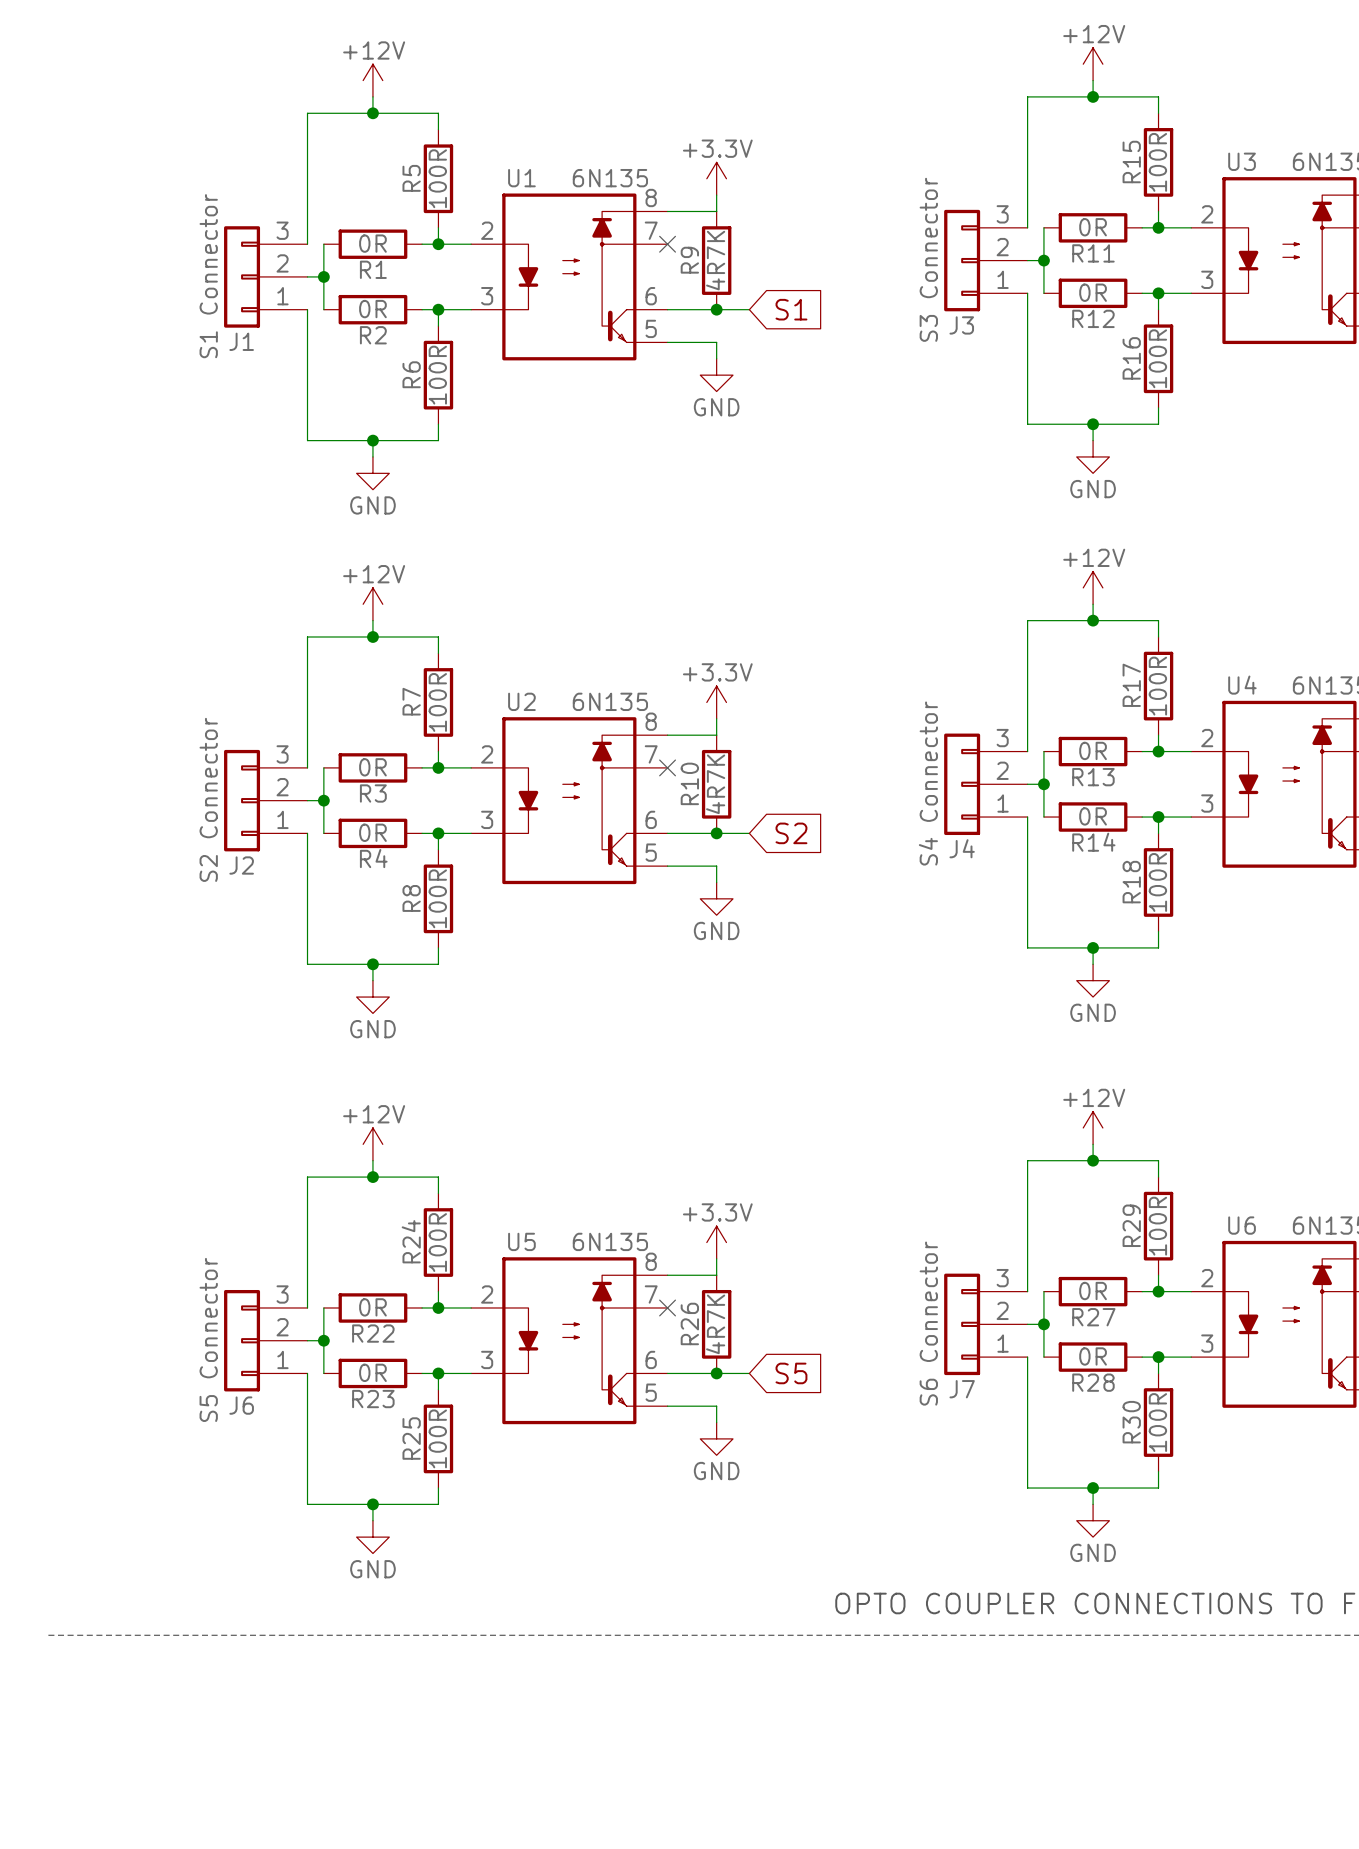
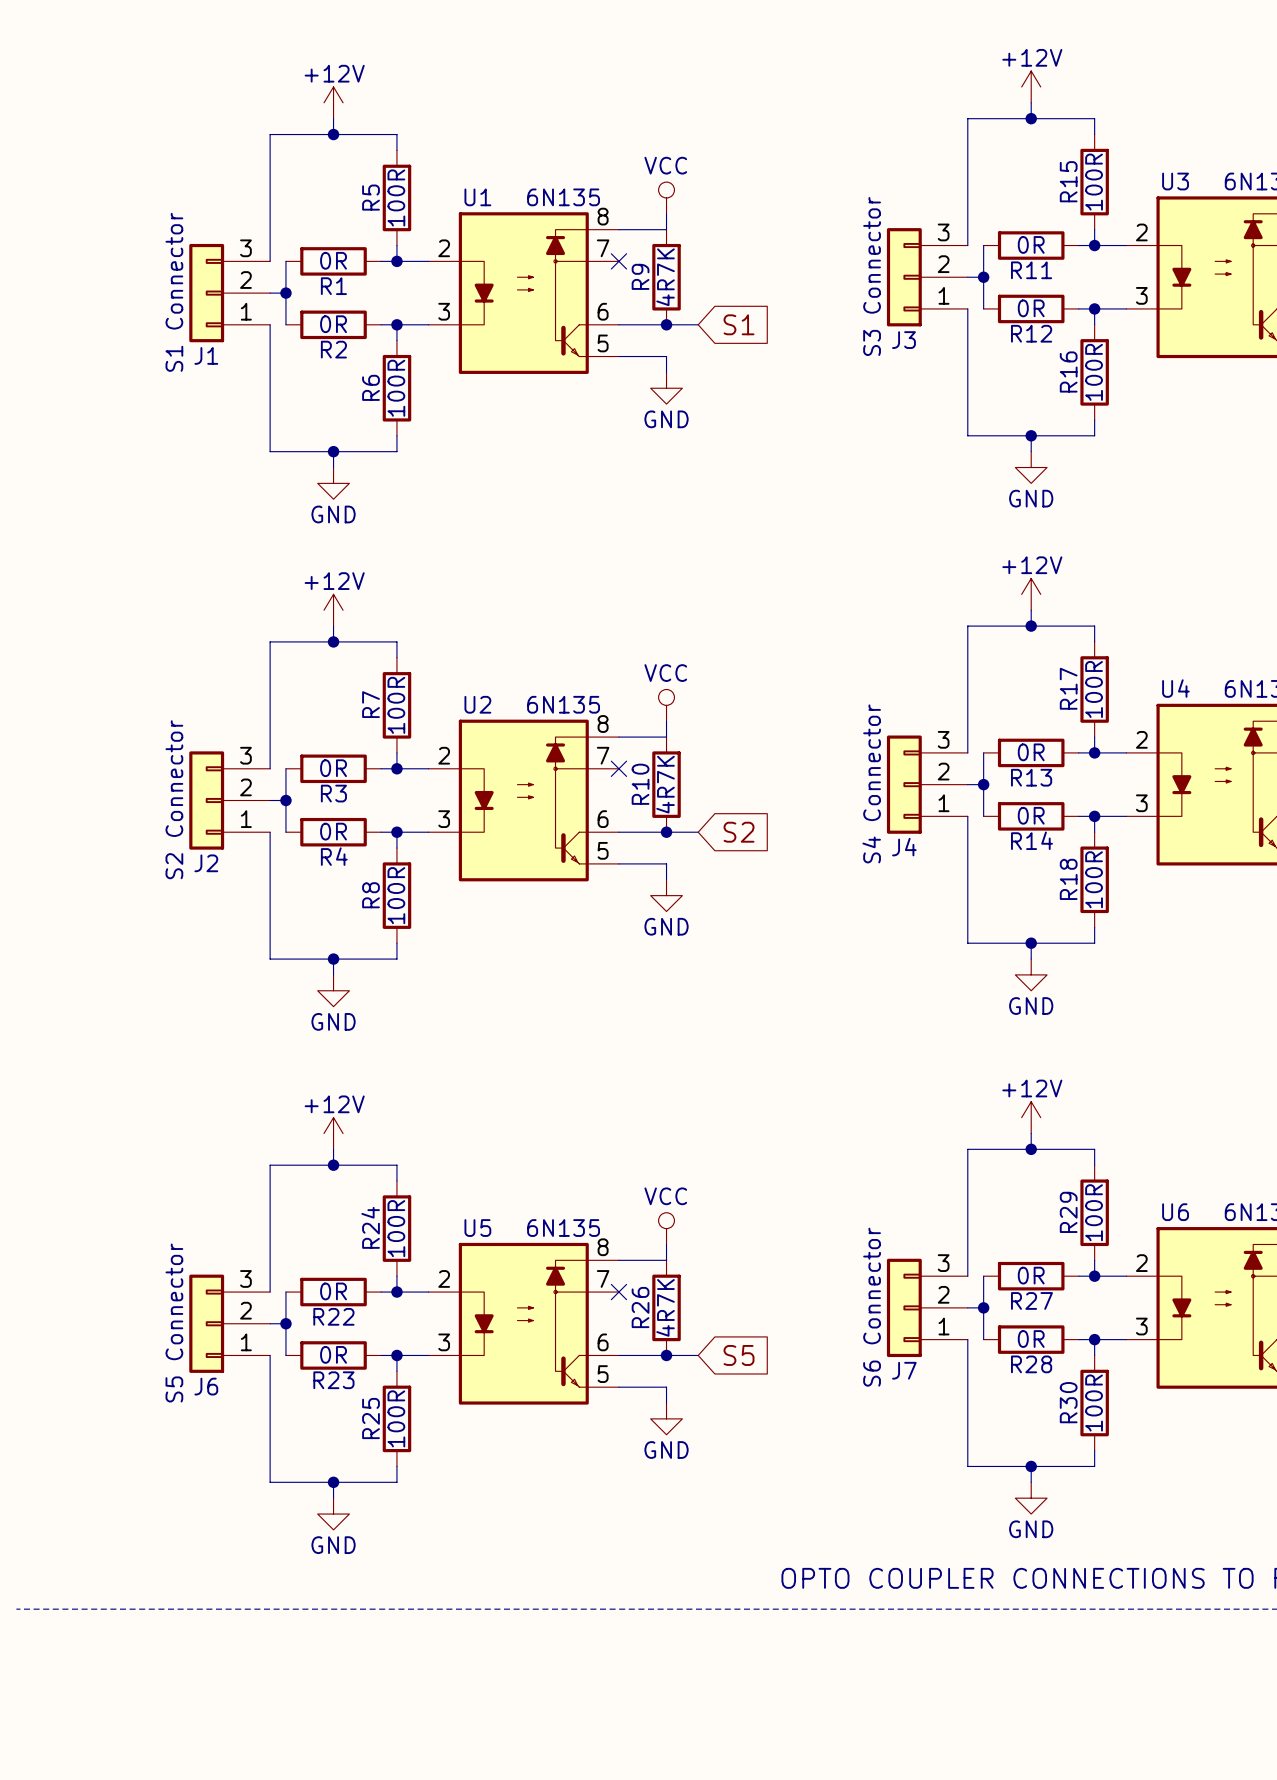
power symbol: +3.3V (716, 178) -> VCC (666, 197)
power symbol: +3.3V (716, 702) -> VCC (666, 705)
power symbol: +3.3V (716, 1242) -> VCC (666, 1228)

